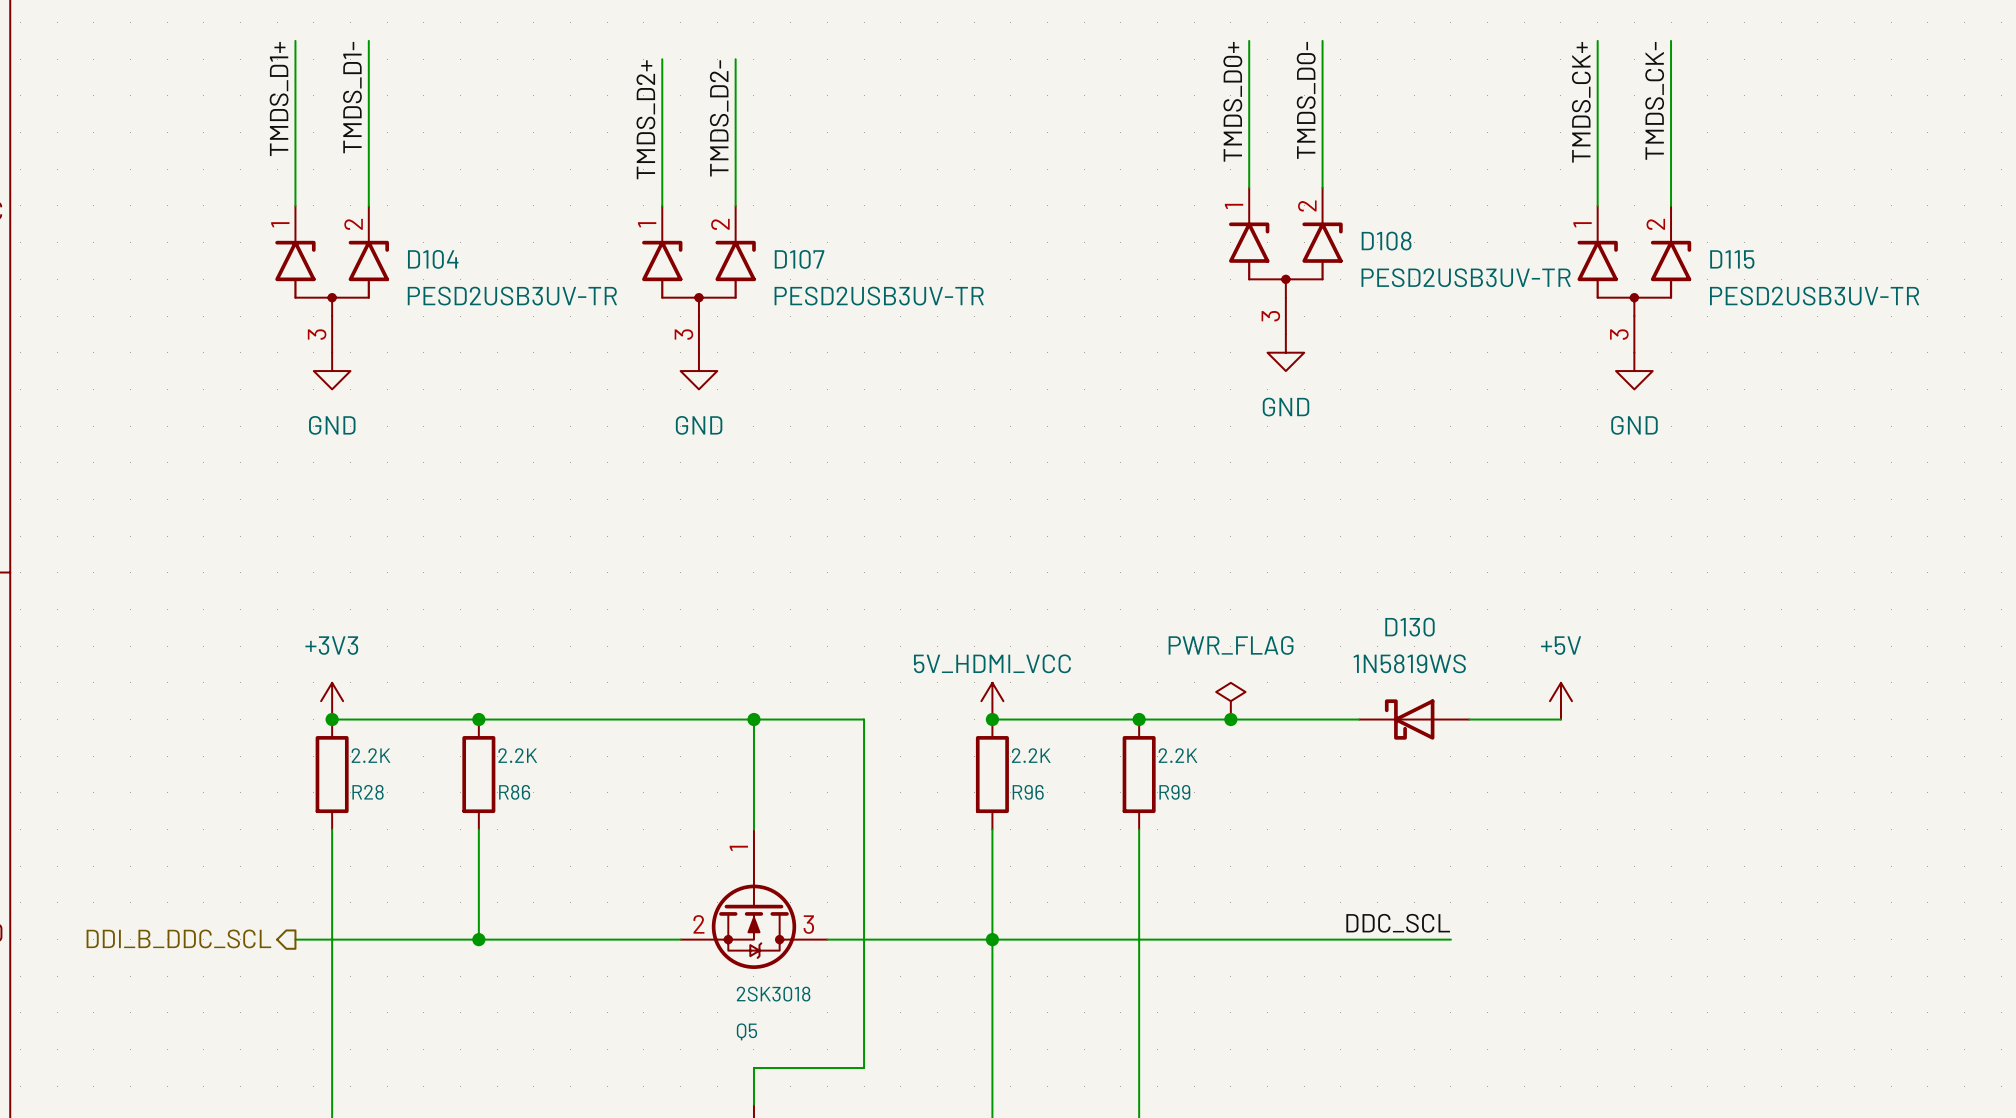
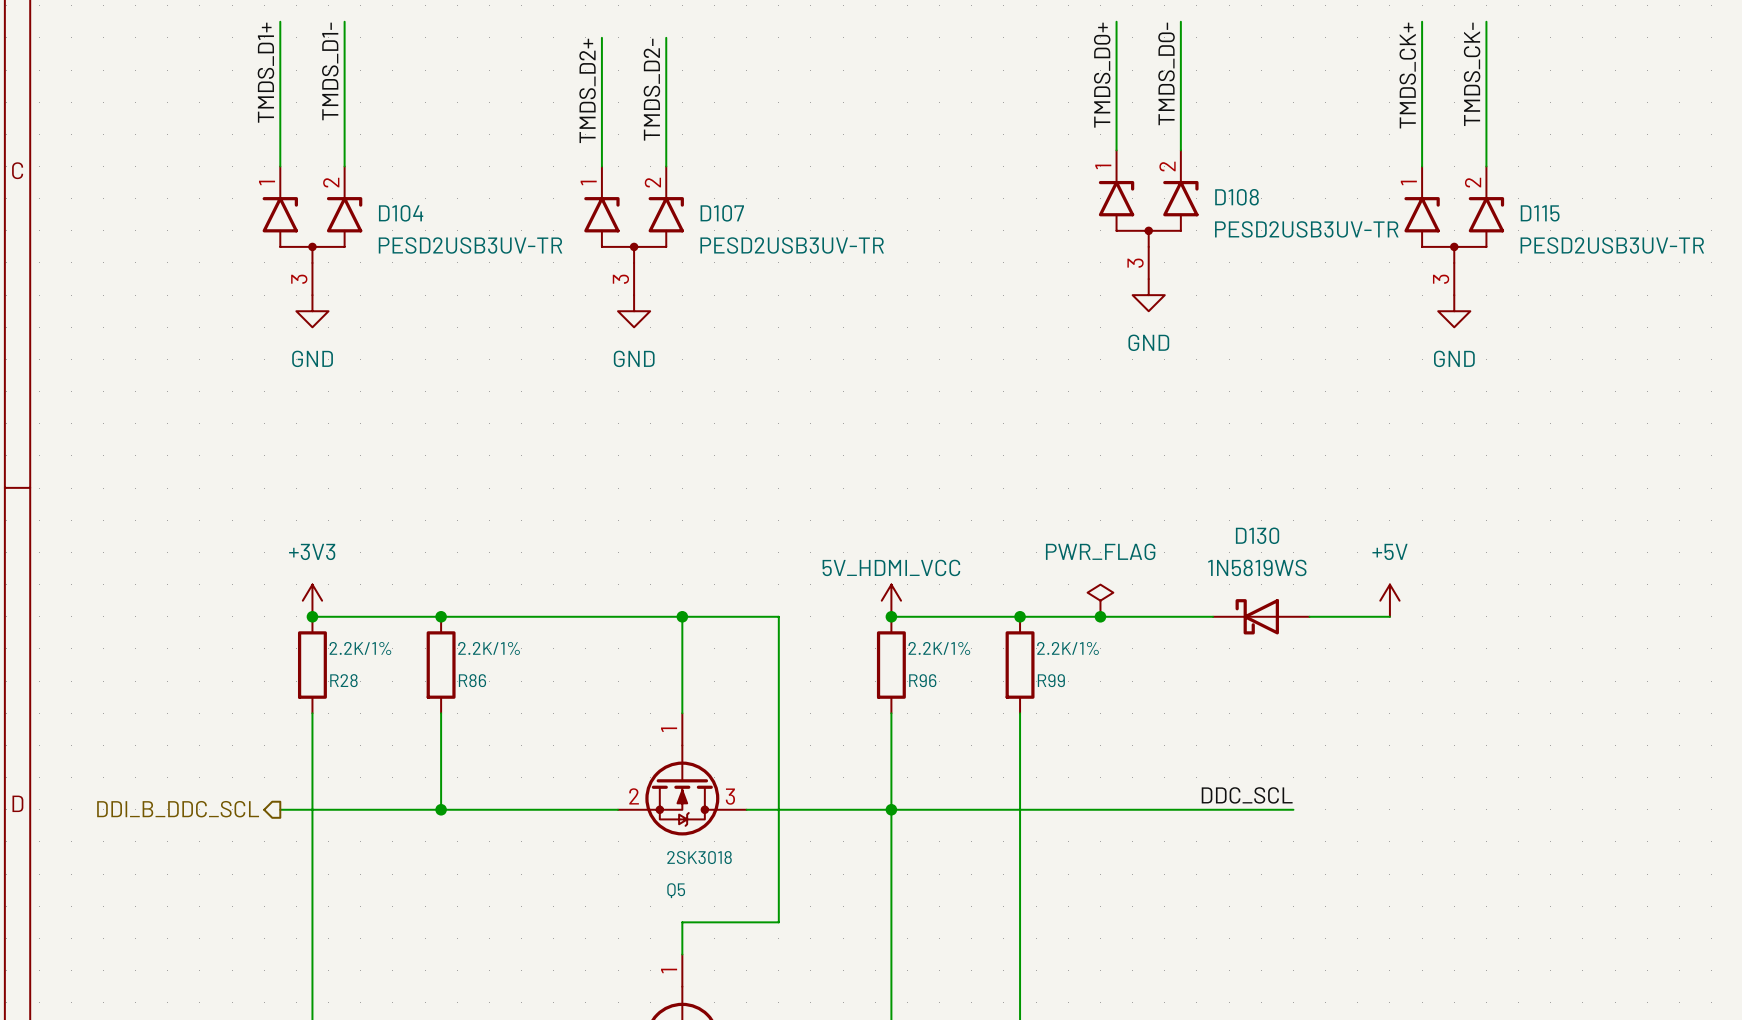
R28 value: 2.2K (371, 755) -> 2.2K/1% (360, 648)
R86 value: 2.2K (517, 755) -> 2.2K/1% (489, 648)
R96 value: 2.2K (1031, 755) -> 2.2K/1% (939, 648)
R99 value: 2.2K (1178, 755) -> 2.2K/1% (1068, 648)

